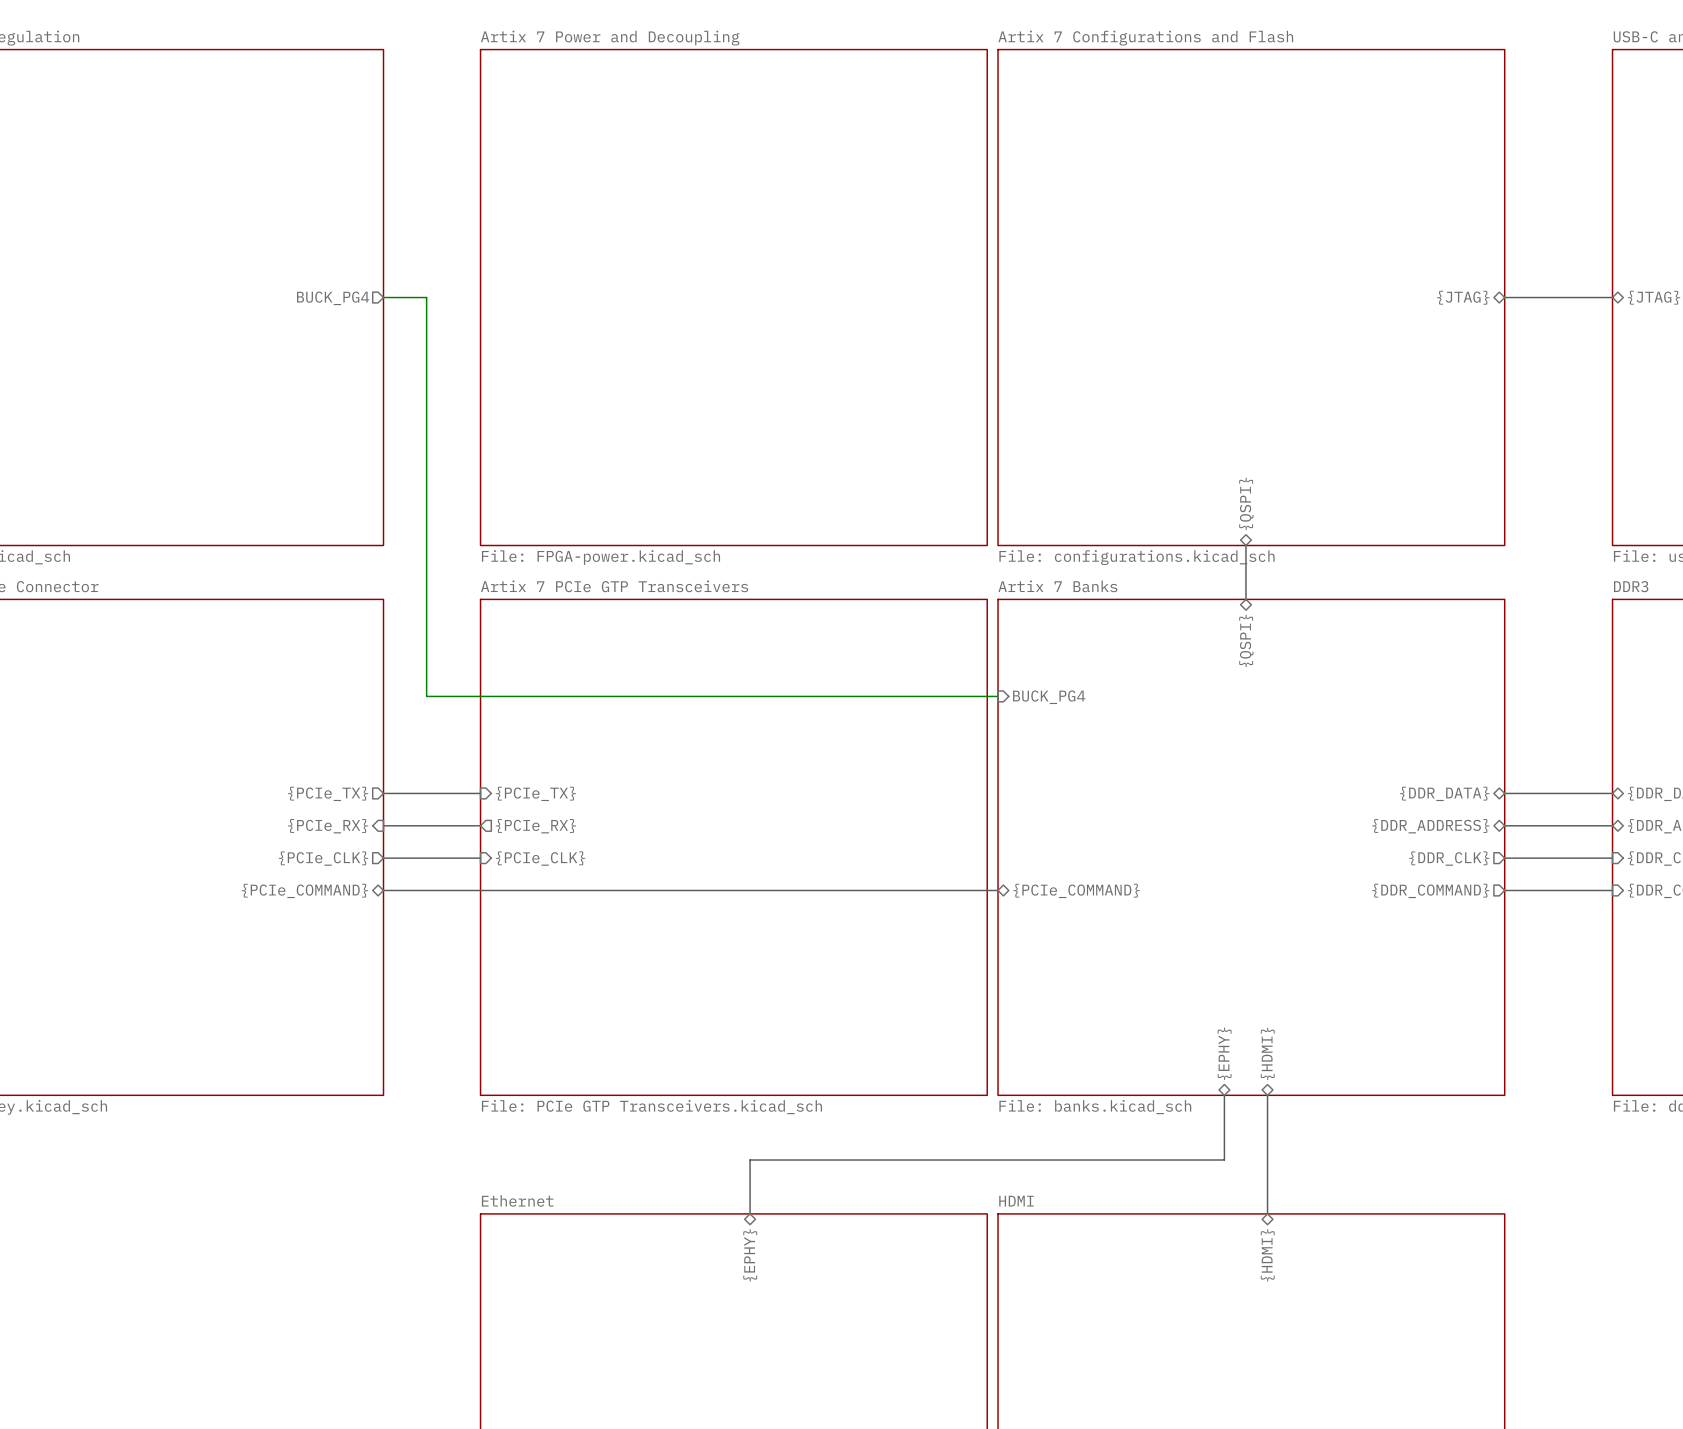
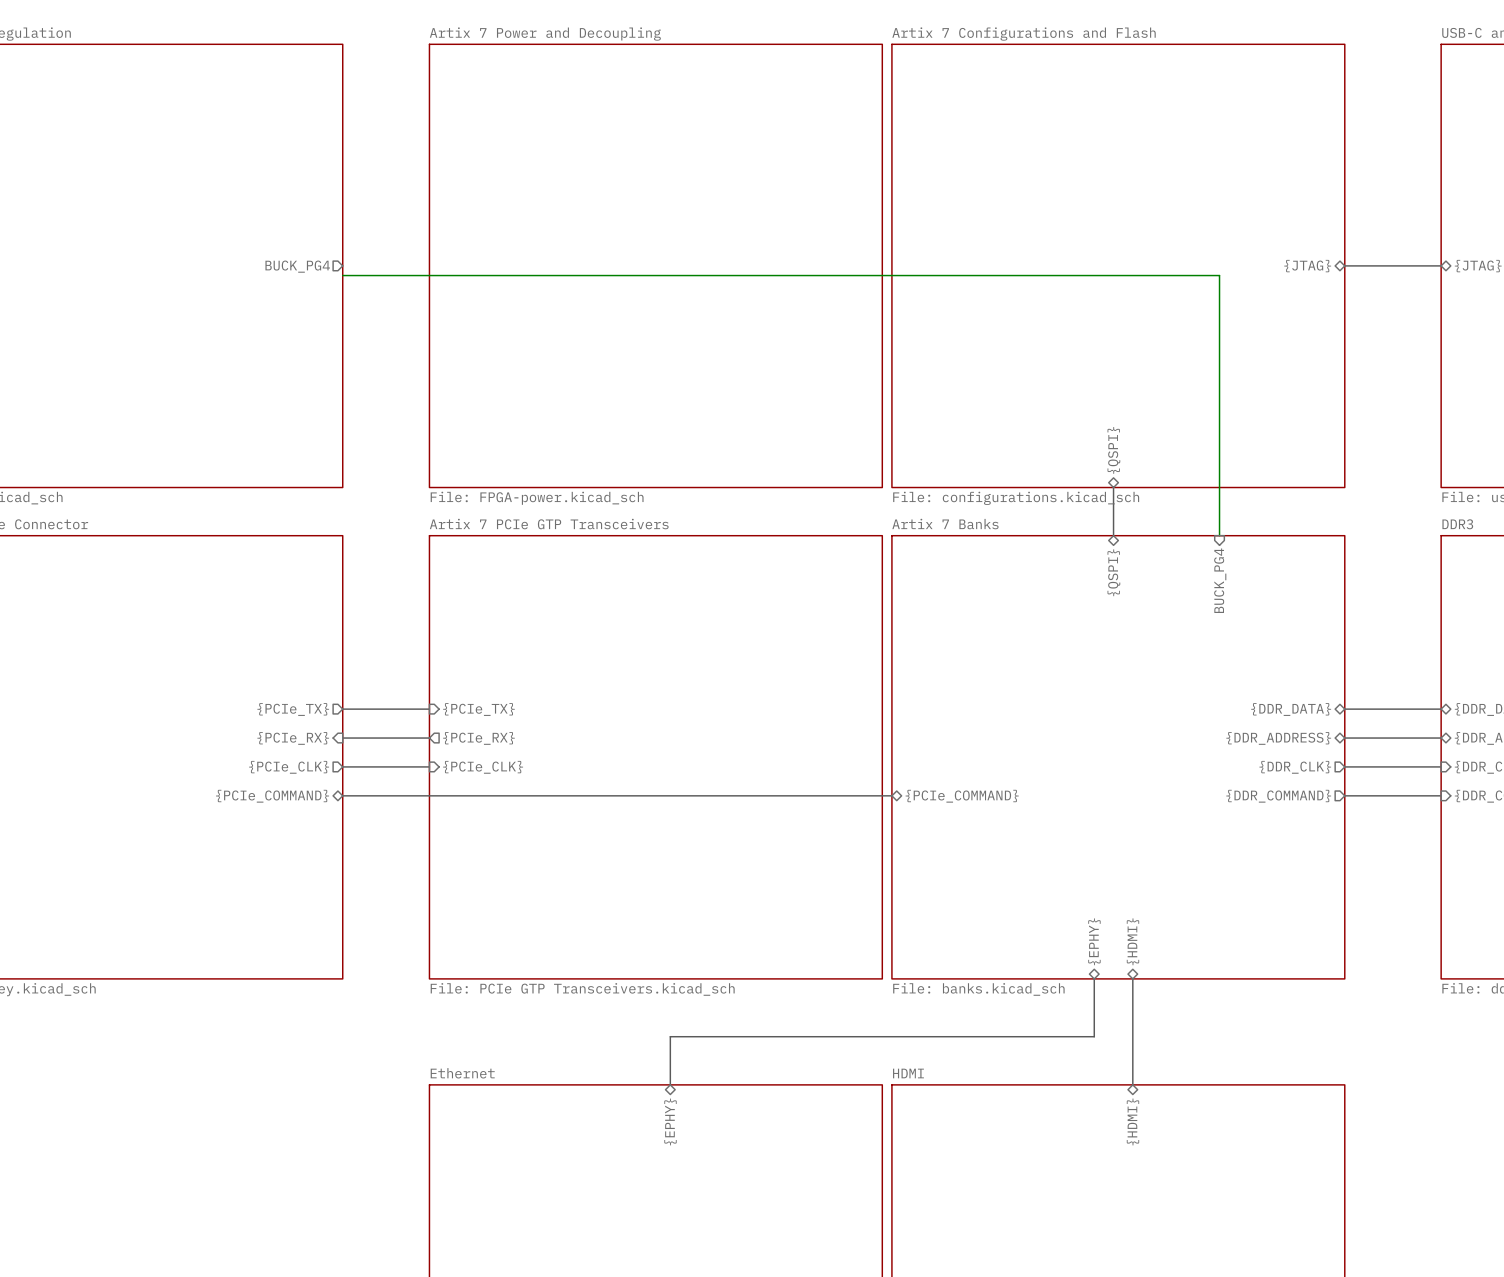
wire: (383, 297) (426, 297) (426, 696) (998, 696) -> none
wire: none -> (342, 275) (1219, 275) (1219, 535)
sheet pin: none -> BUCK_PG4 (1220, 580)
sheet pin: BUCK_PG4 (1049, 697) -> none

